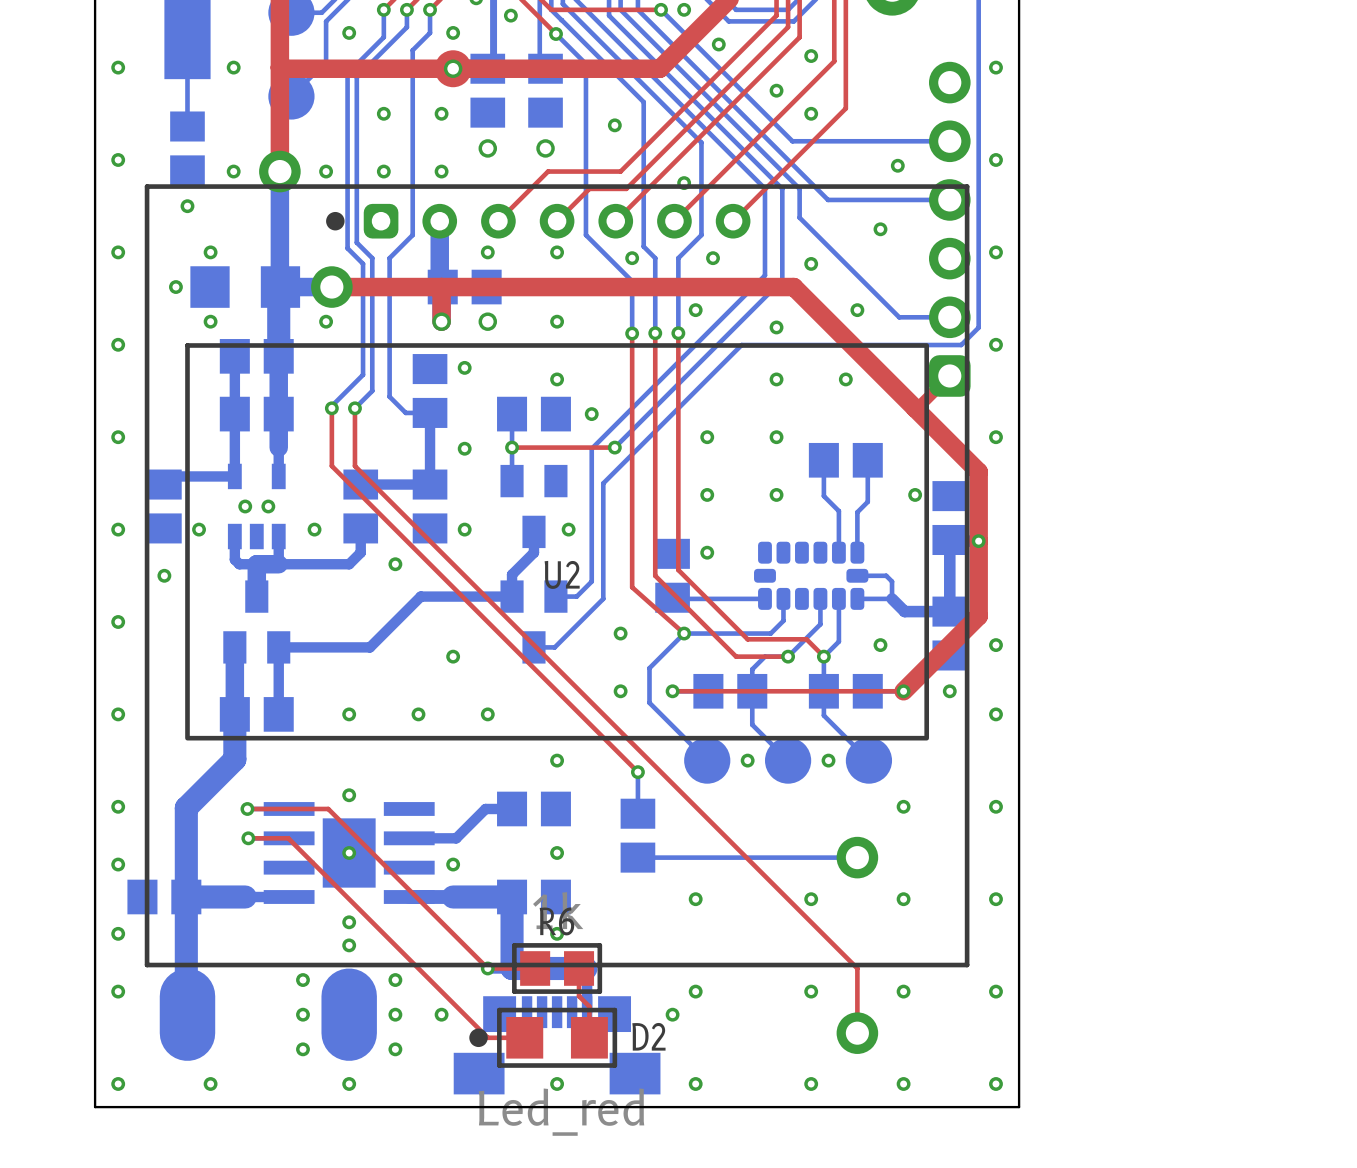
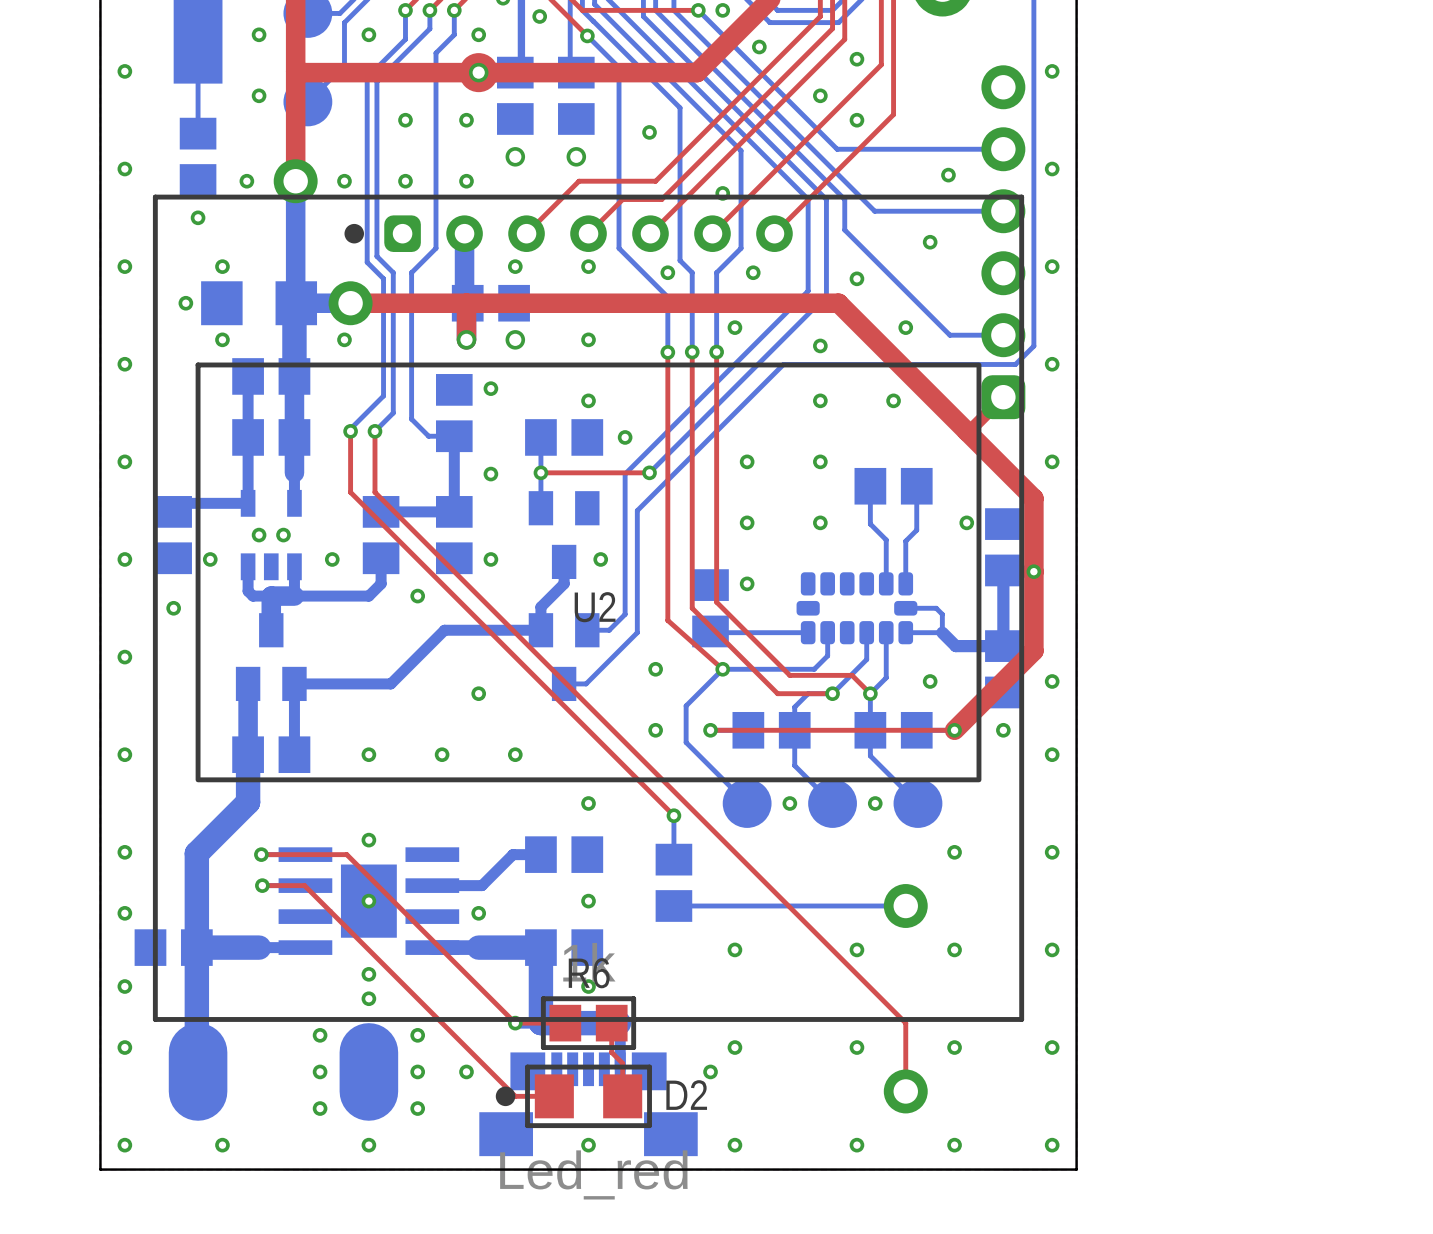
via: none -> (259, 34)
via: (233, 67) -> none
via: none -> (259, 95)

